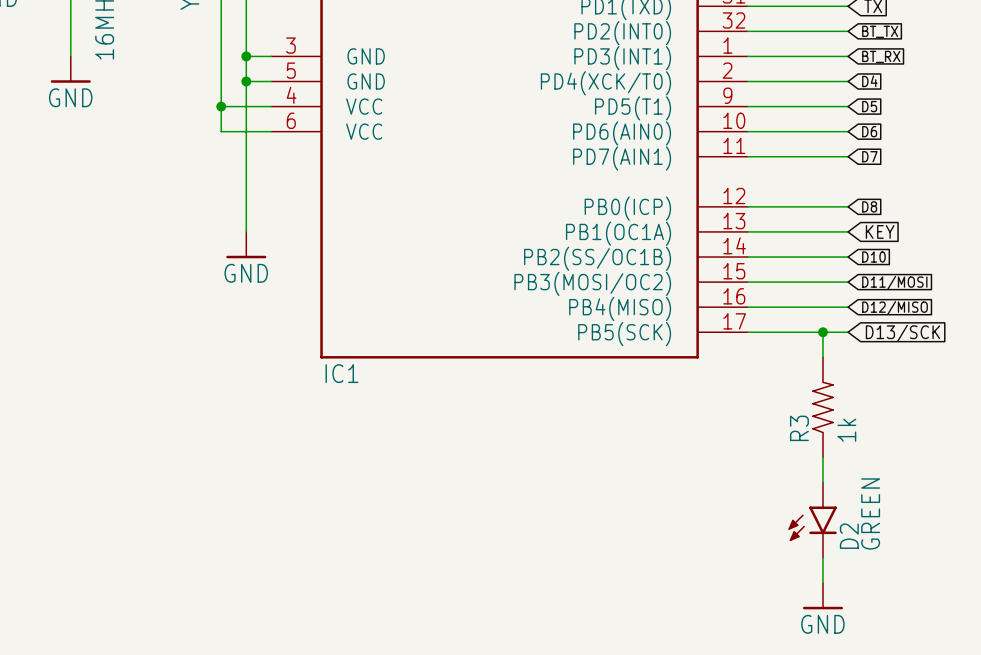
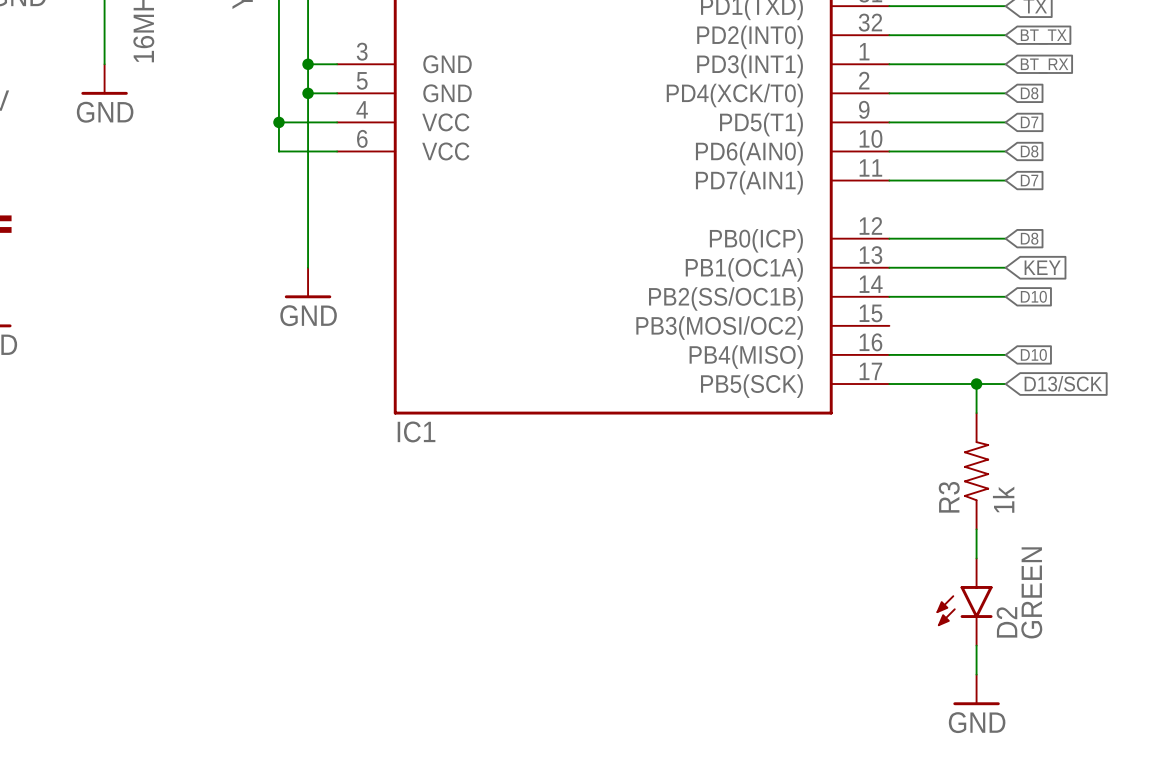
global label: D4 (869, 81) -> D8 (1029, 93)
global label: D5 (869, 106) -> D7 (1029, 122)
global label: D6 (869, 131) -> D8 (1029, 151)
wire: (747, 282) (848, 282) -> none
global label: D11/MOSI (894, 283) -> none
global label: D12/MISO (895, 308) -> D10 (1033, 354)

